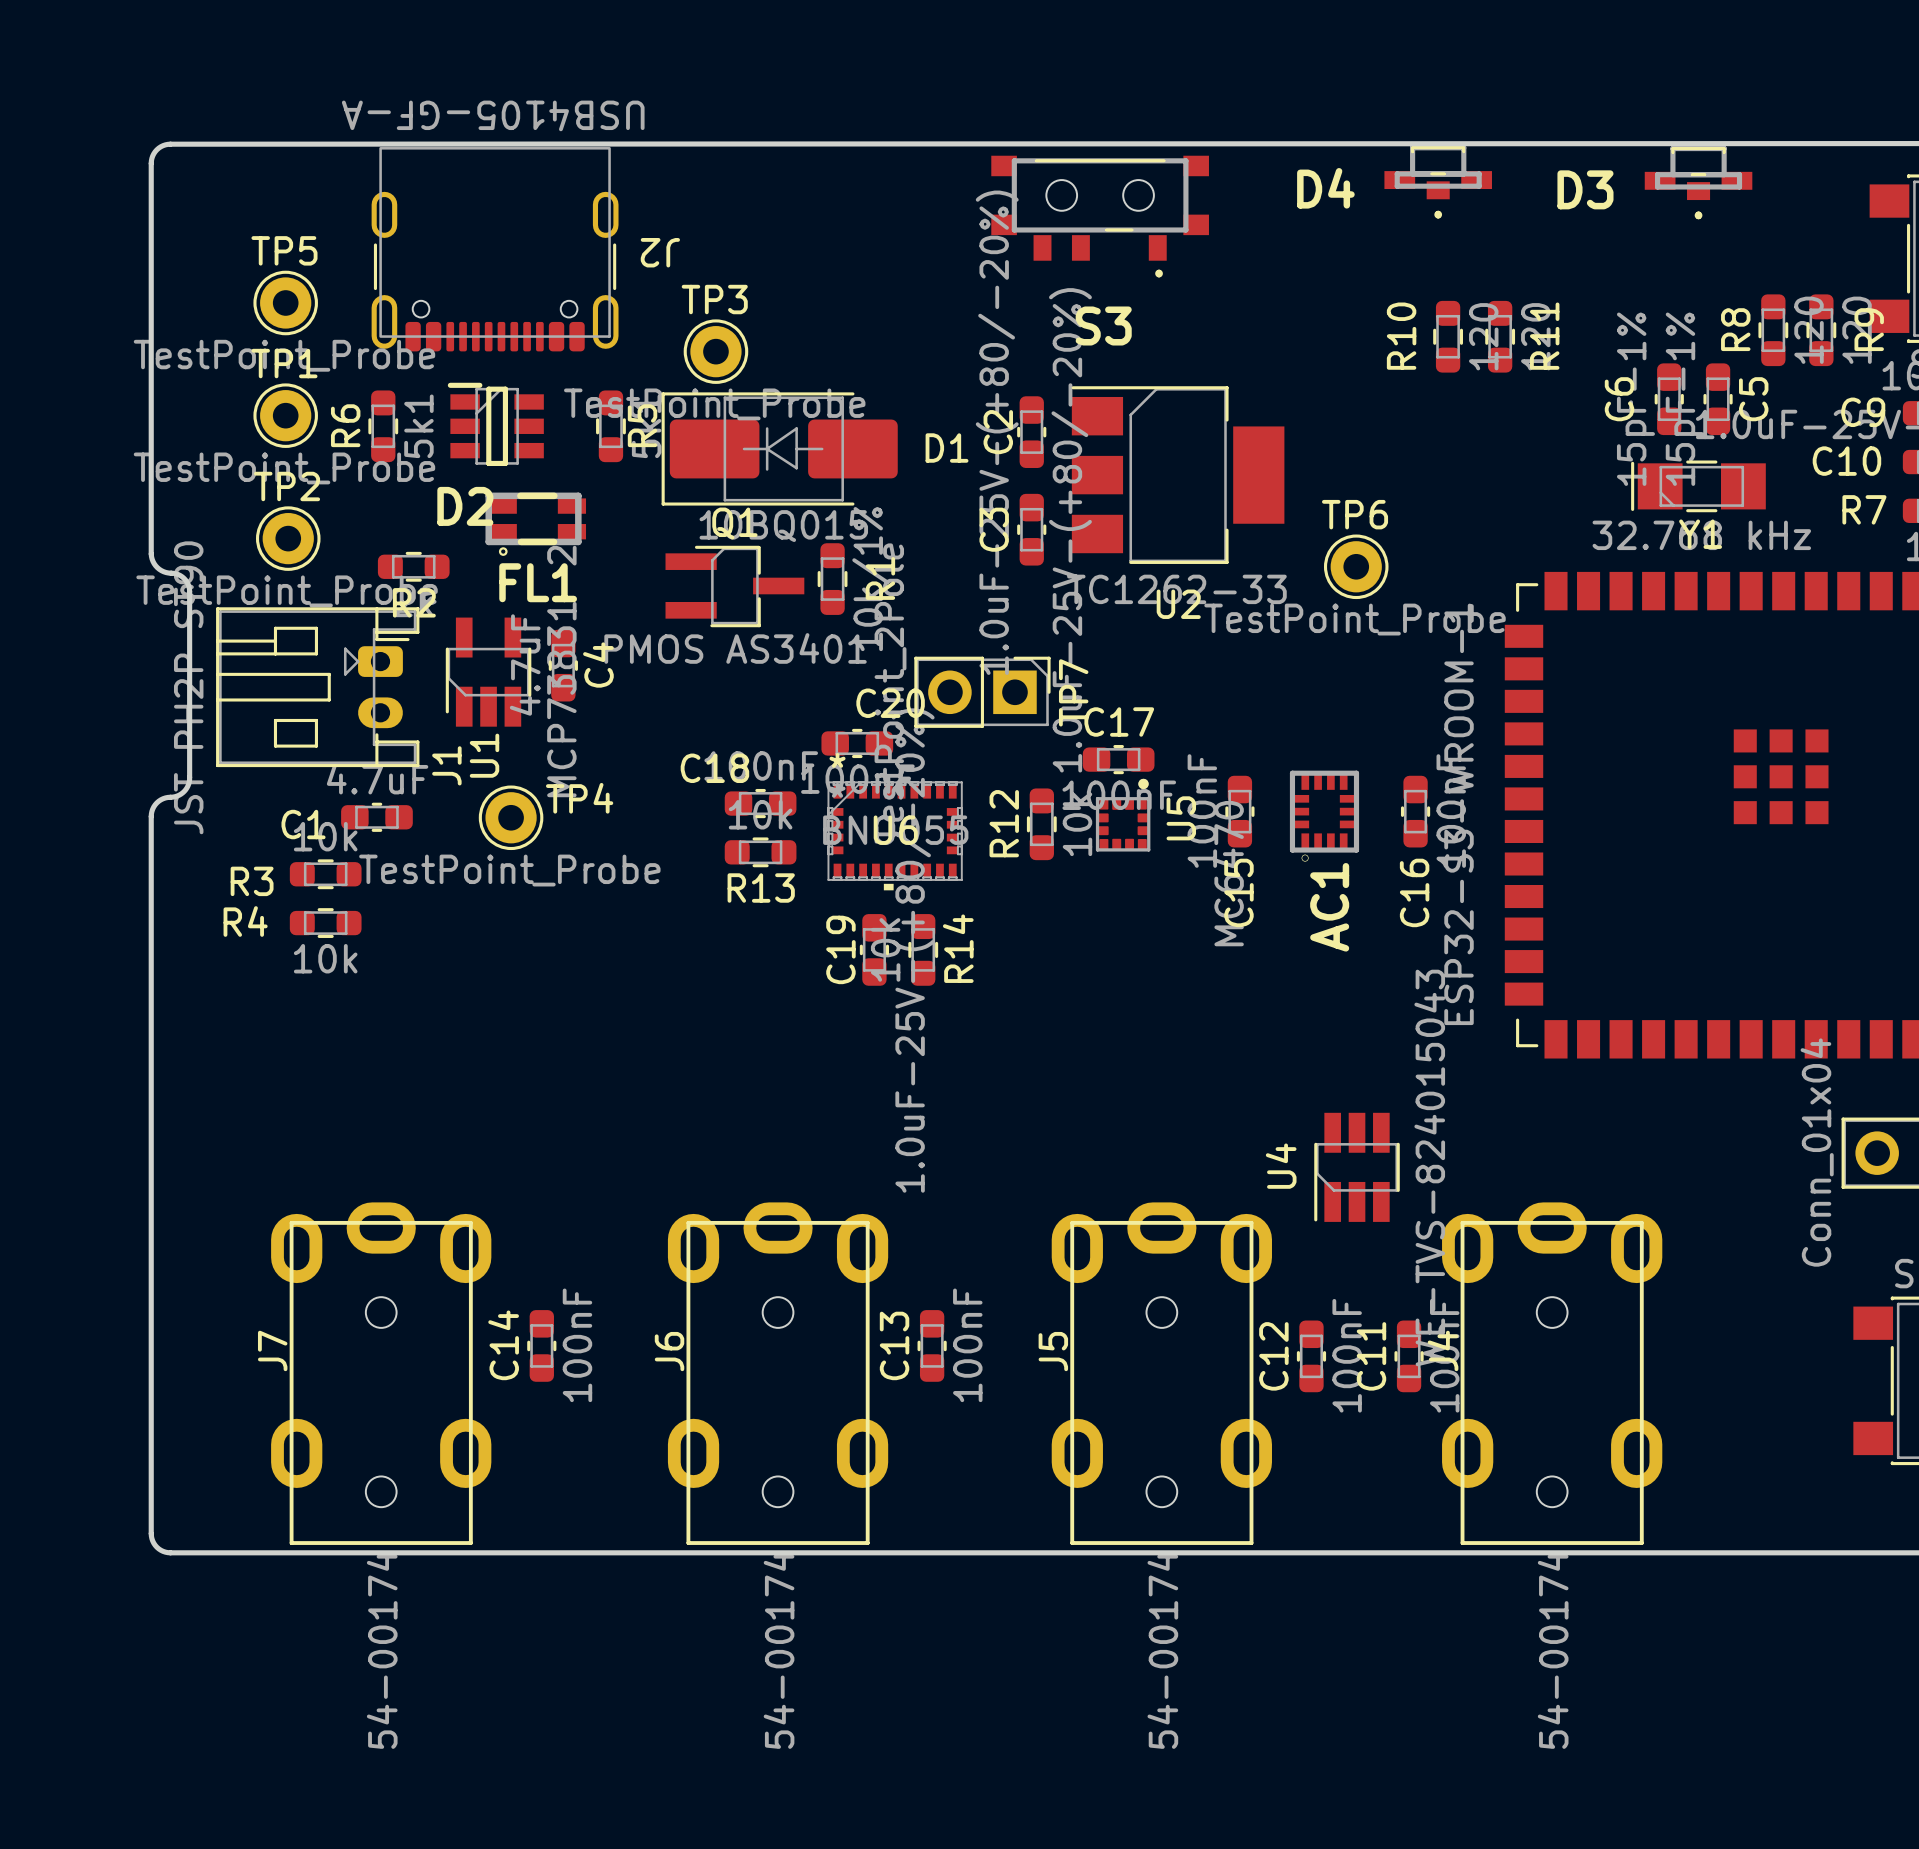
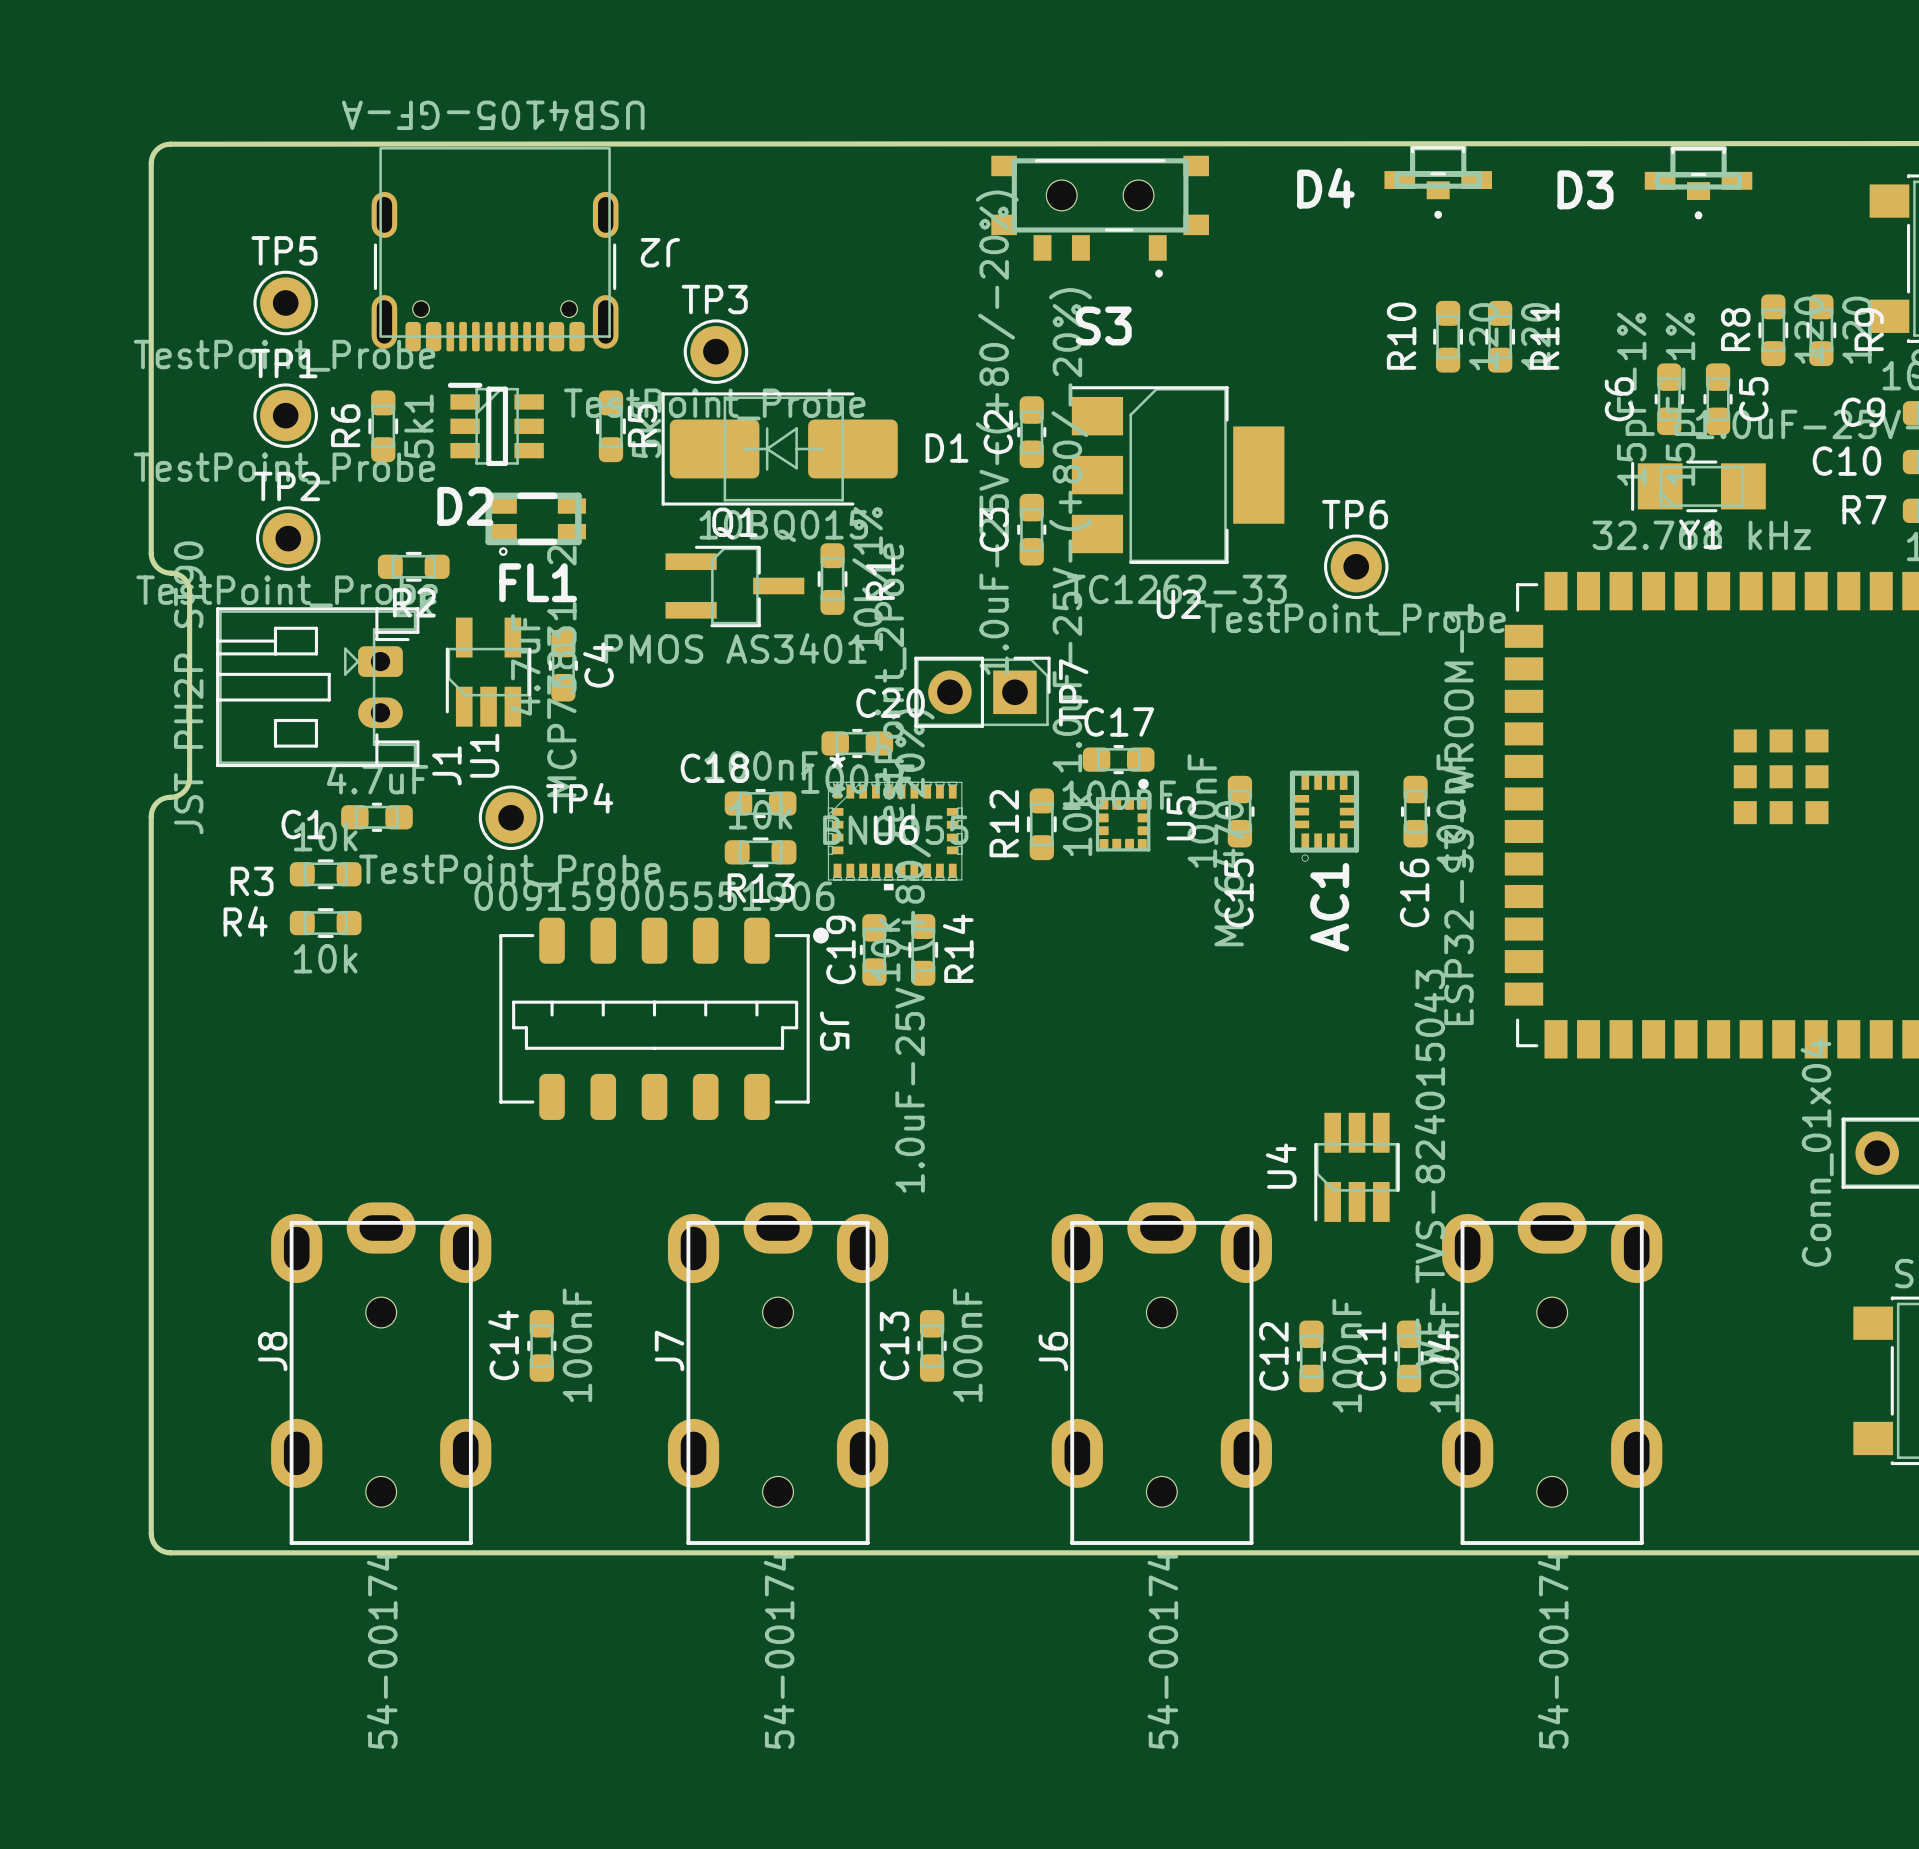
J5: none -> 009159005551906 (664, 1018)
J7 name: J7 (272, 1350) -> J8 (272, 1351)
J6 name: J6 (669, 1351) -> J7 (669, 1350)
J5 name: J5 (1053, 1351) -> J6 (1053, 1351)

